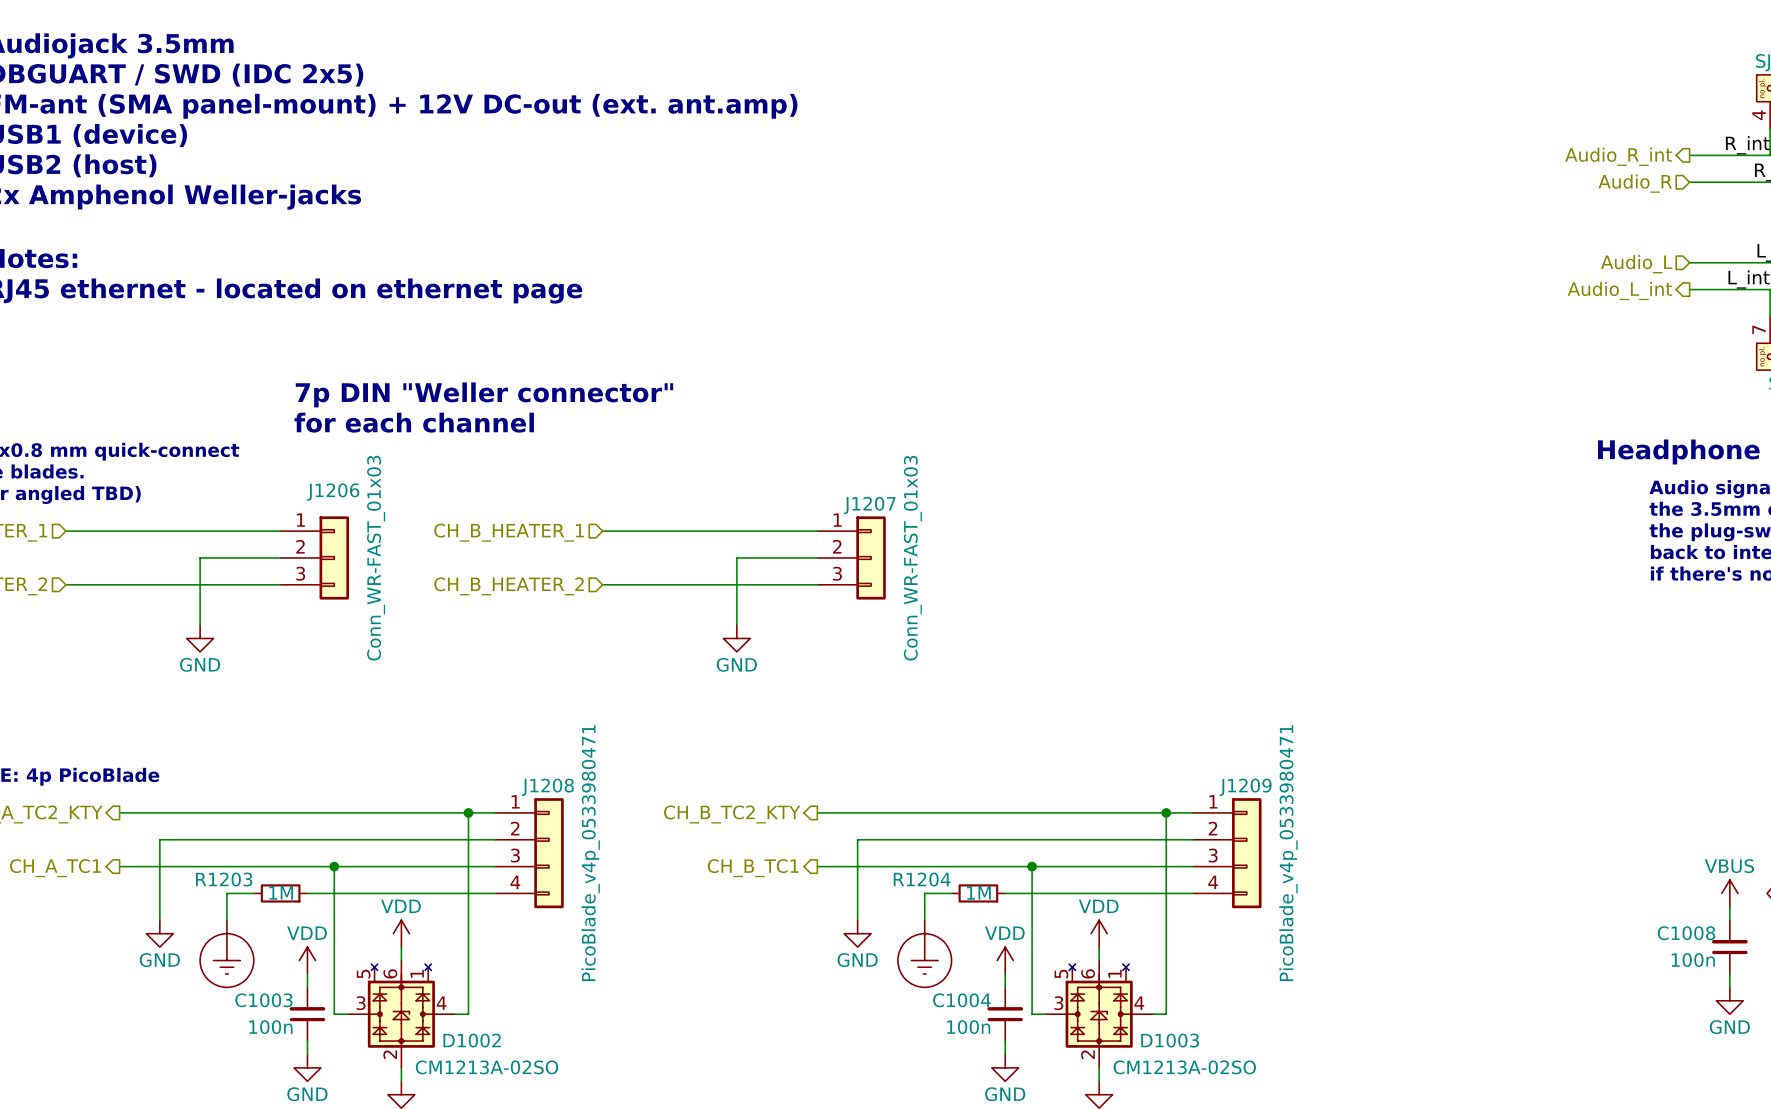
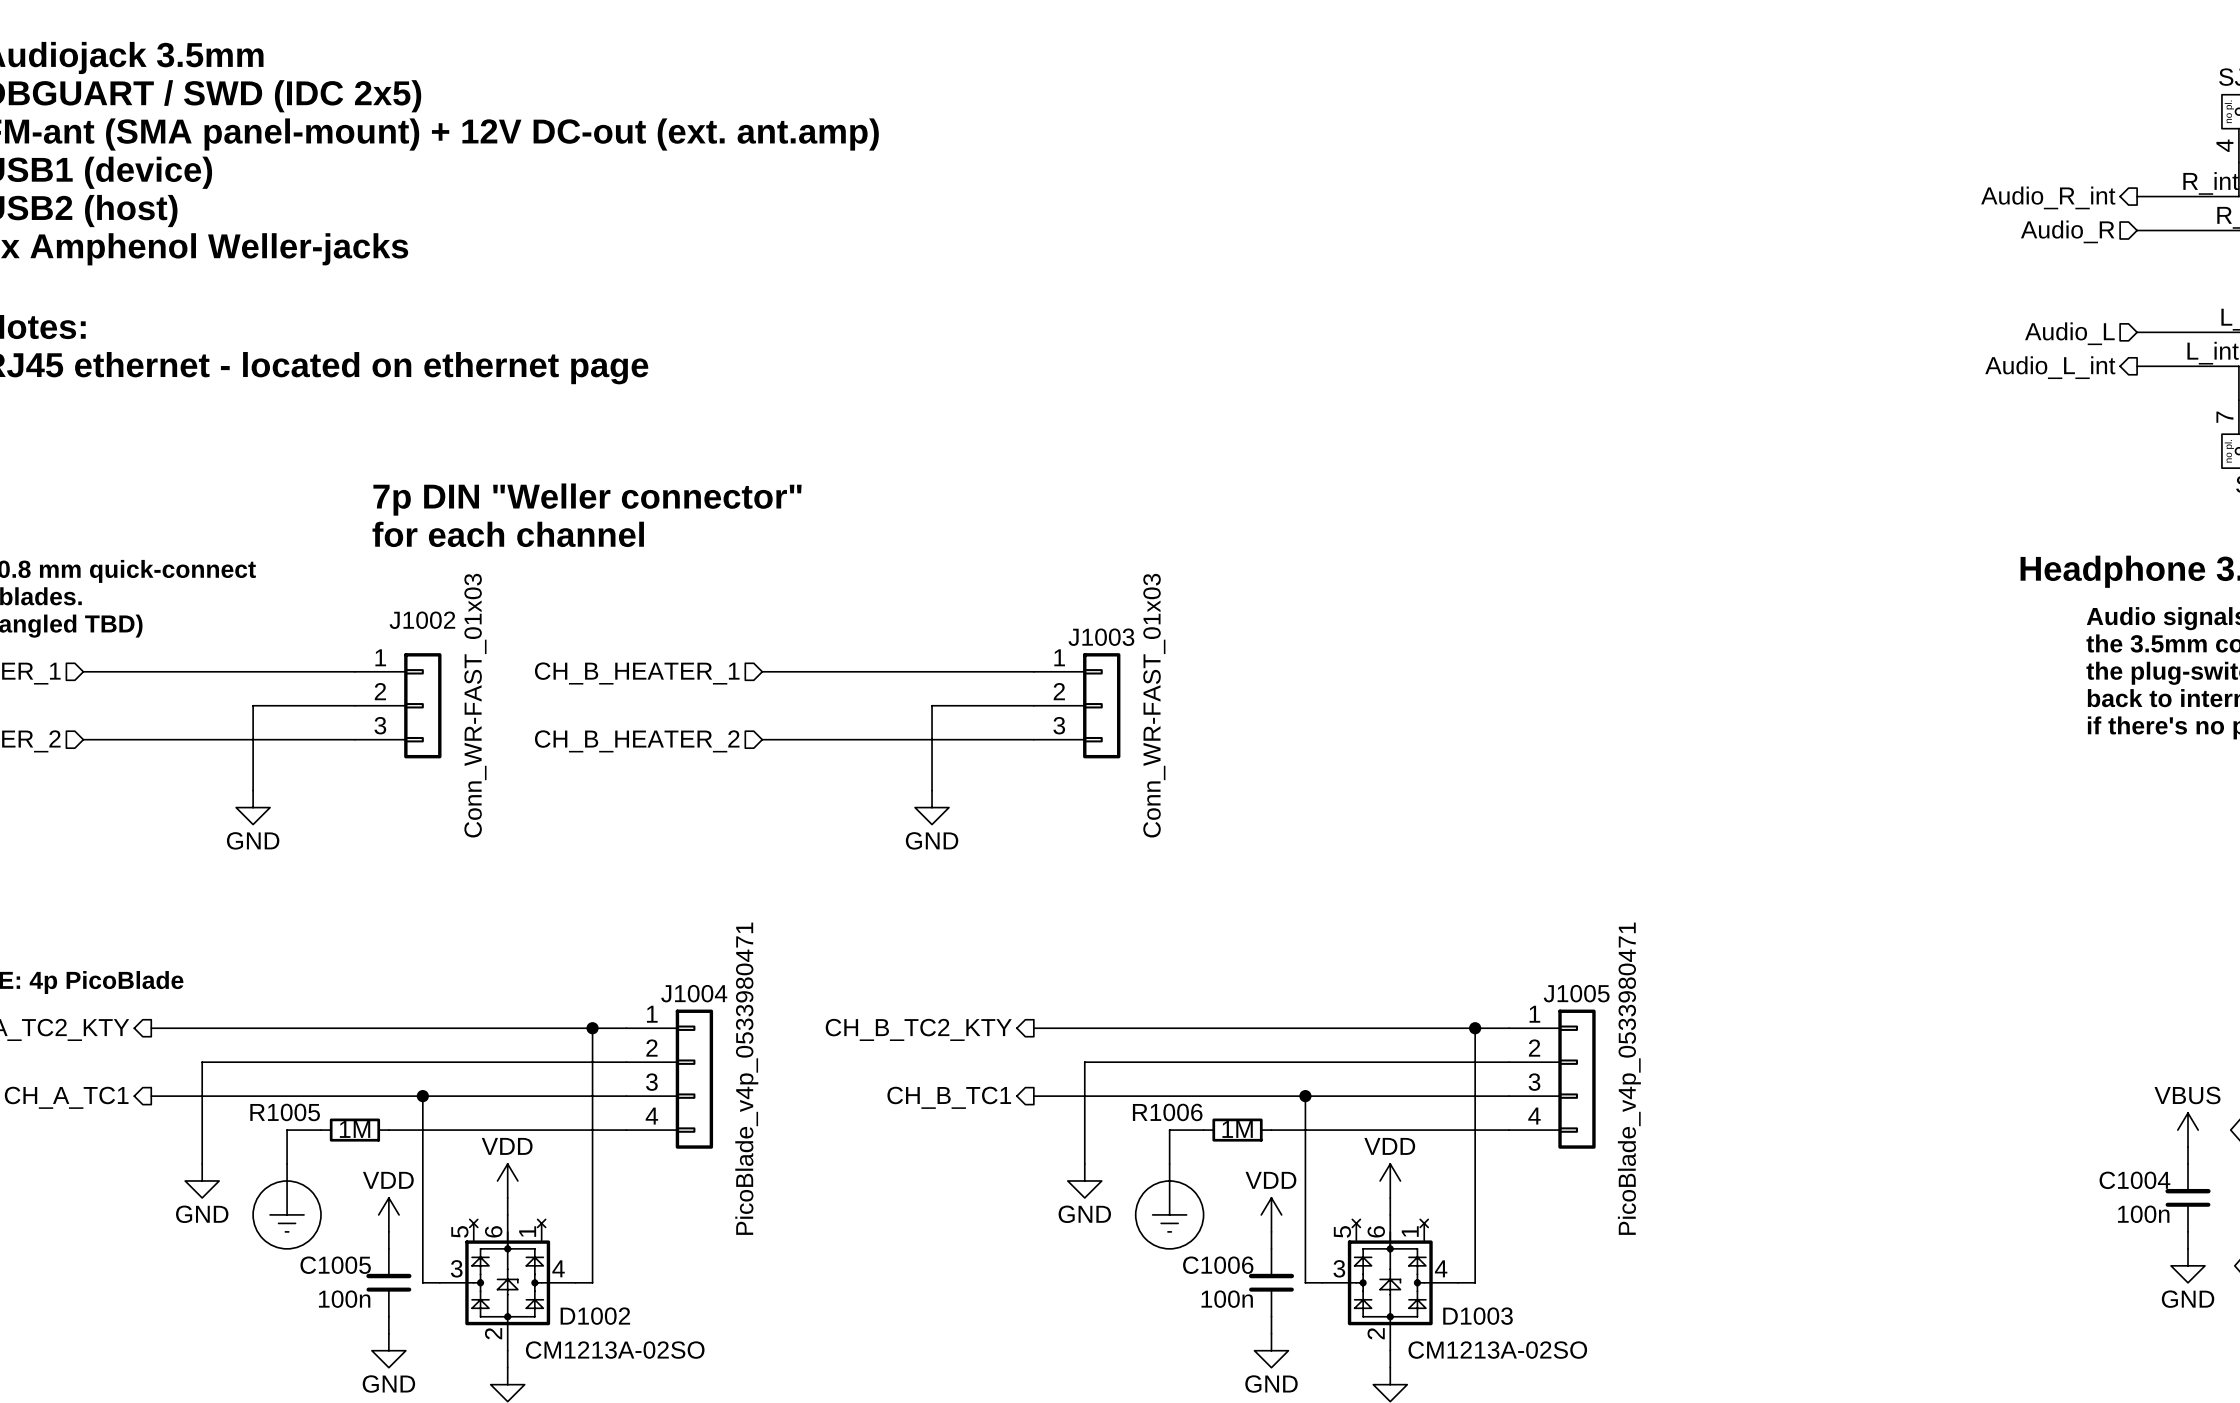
J1206 name: J1206 (333, 492) -> J1002 (422, 620)
J1207 name: J1207 (869, 505) -> J1003 (1101, 637)
J1208 name: J1208 (547, 787) -> J1004 (694, 993)
J1209 name: J1209 (1245, 787) -> J1005 (1576, 993)
R1203 name: R1203 (224, 879) -> R1005 (285, 1112)
R1204 name: R1204 (922, 879) -> R1006 (1167, 1112)
C1008 name: C1008 (1686, 933) -> C1004 (2134, 1180)
C1003 name: C1003 (263, 1000) -> C1005 (335, 1265)
C1004 name: C1004 (961, 1000) -> C1006 (1218, 1265)

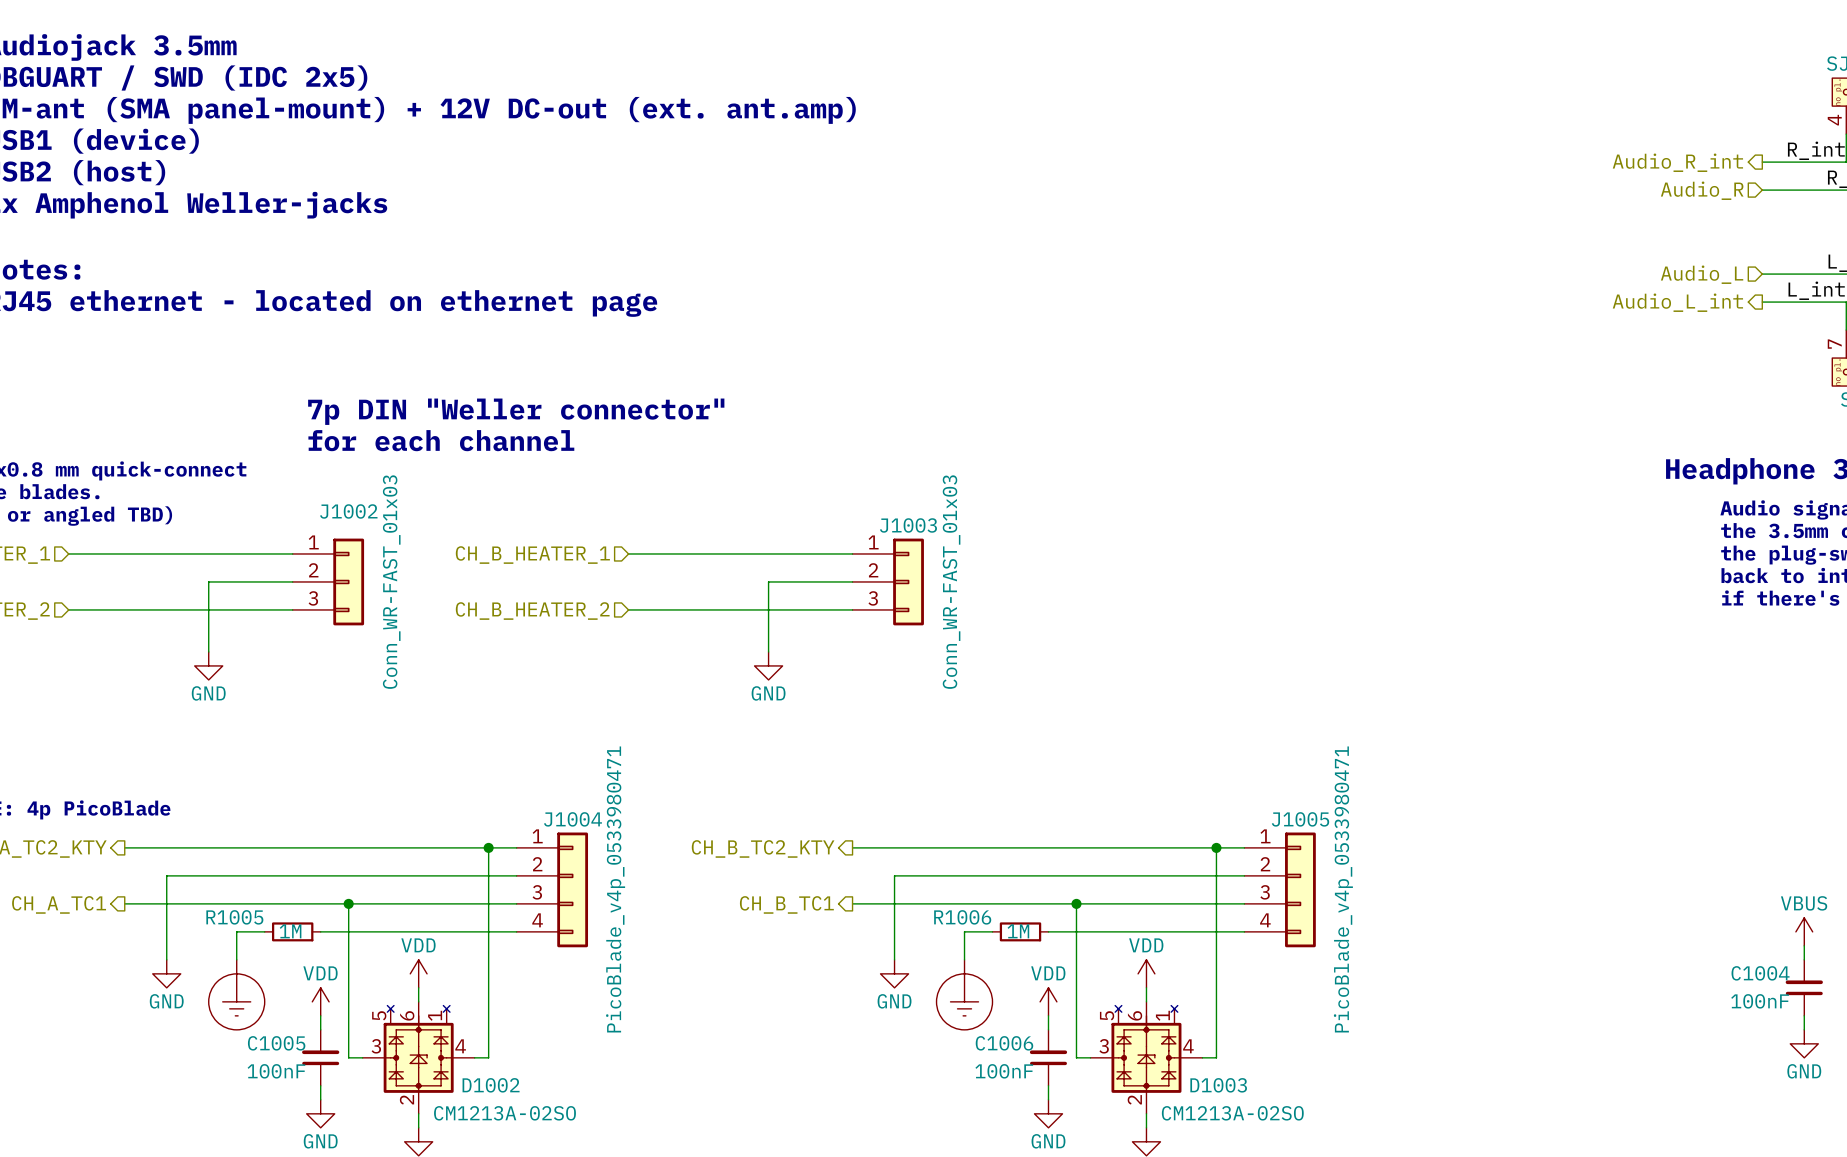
C1004 value: 100n (2143, 1214) -> 100nF (1760, 1001)
C1005 value: 100n (344, 1299) -> 100nF (276, 1071)
C1006 value: 100n (1227, 1299) -> 100nF (1004, 1071)

